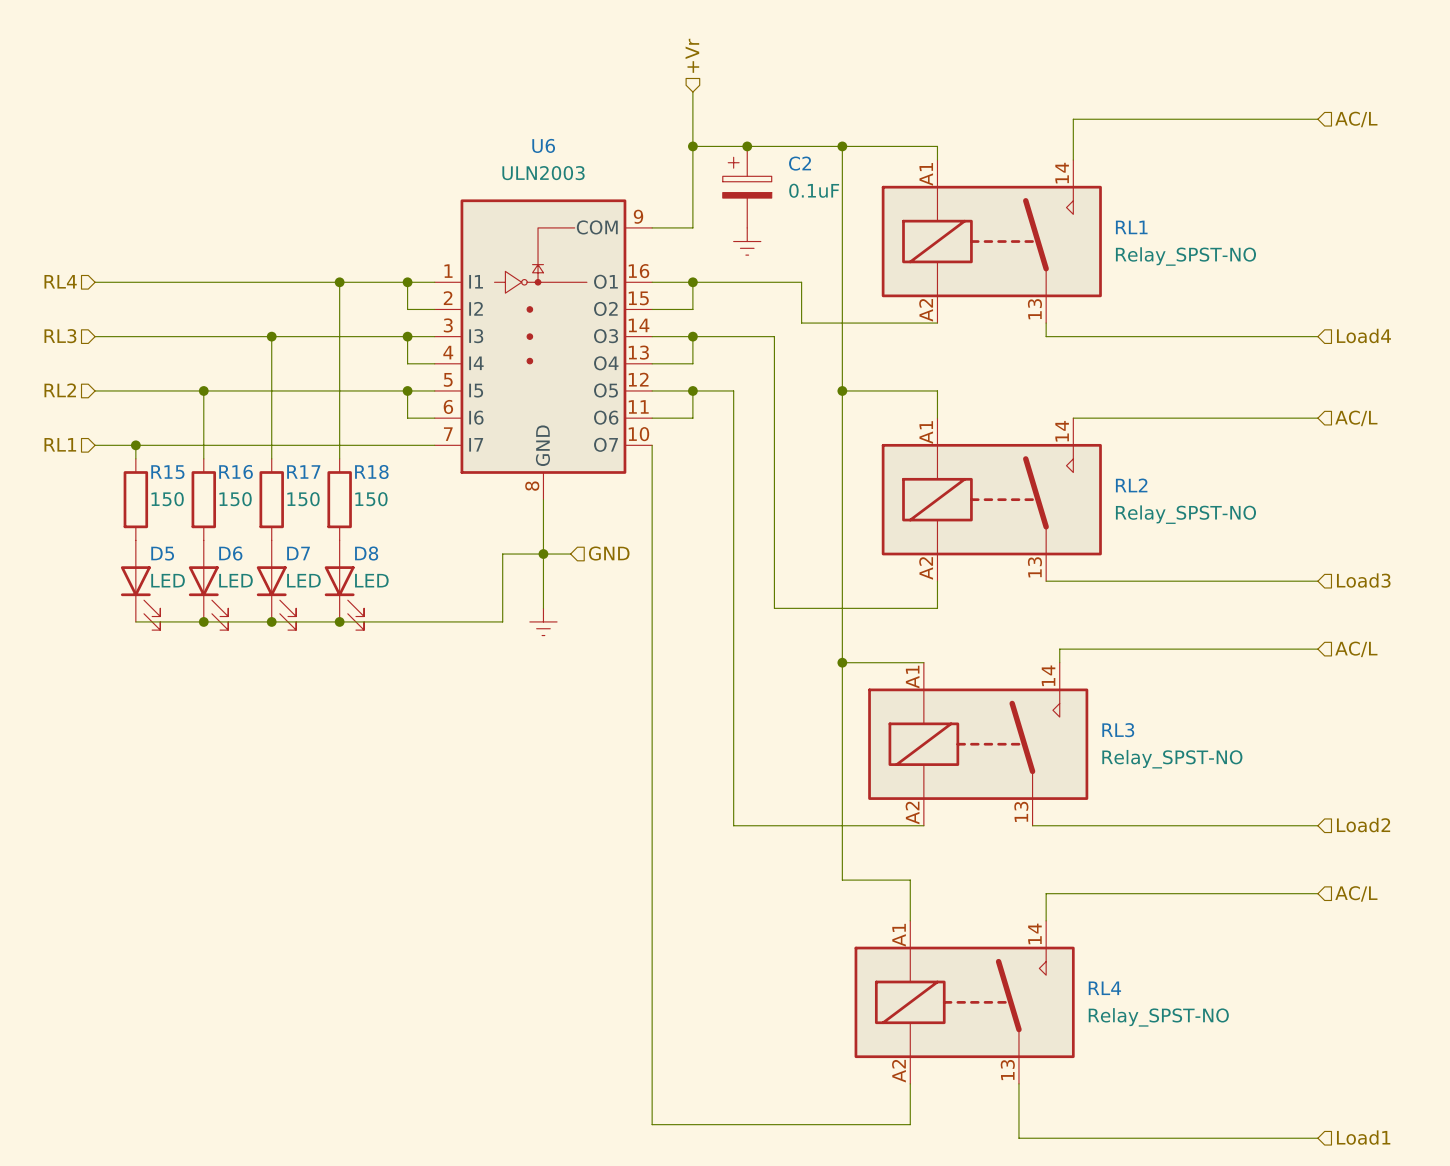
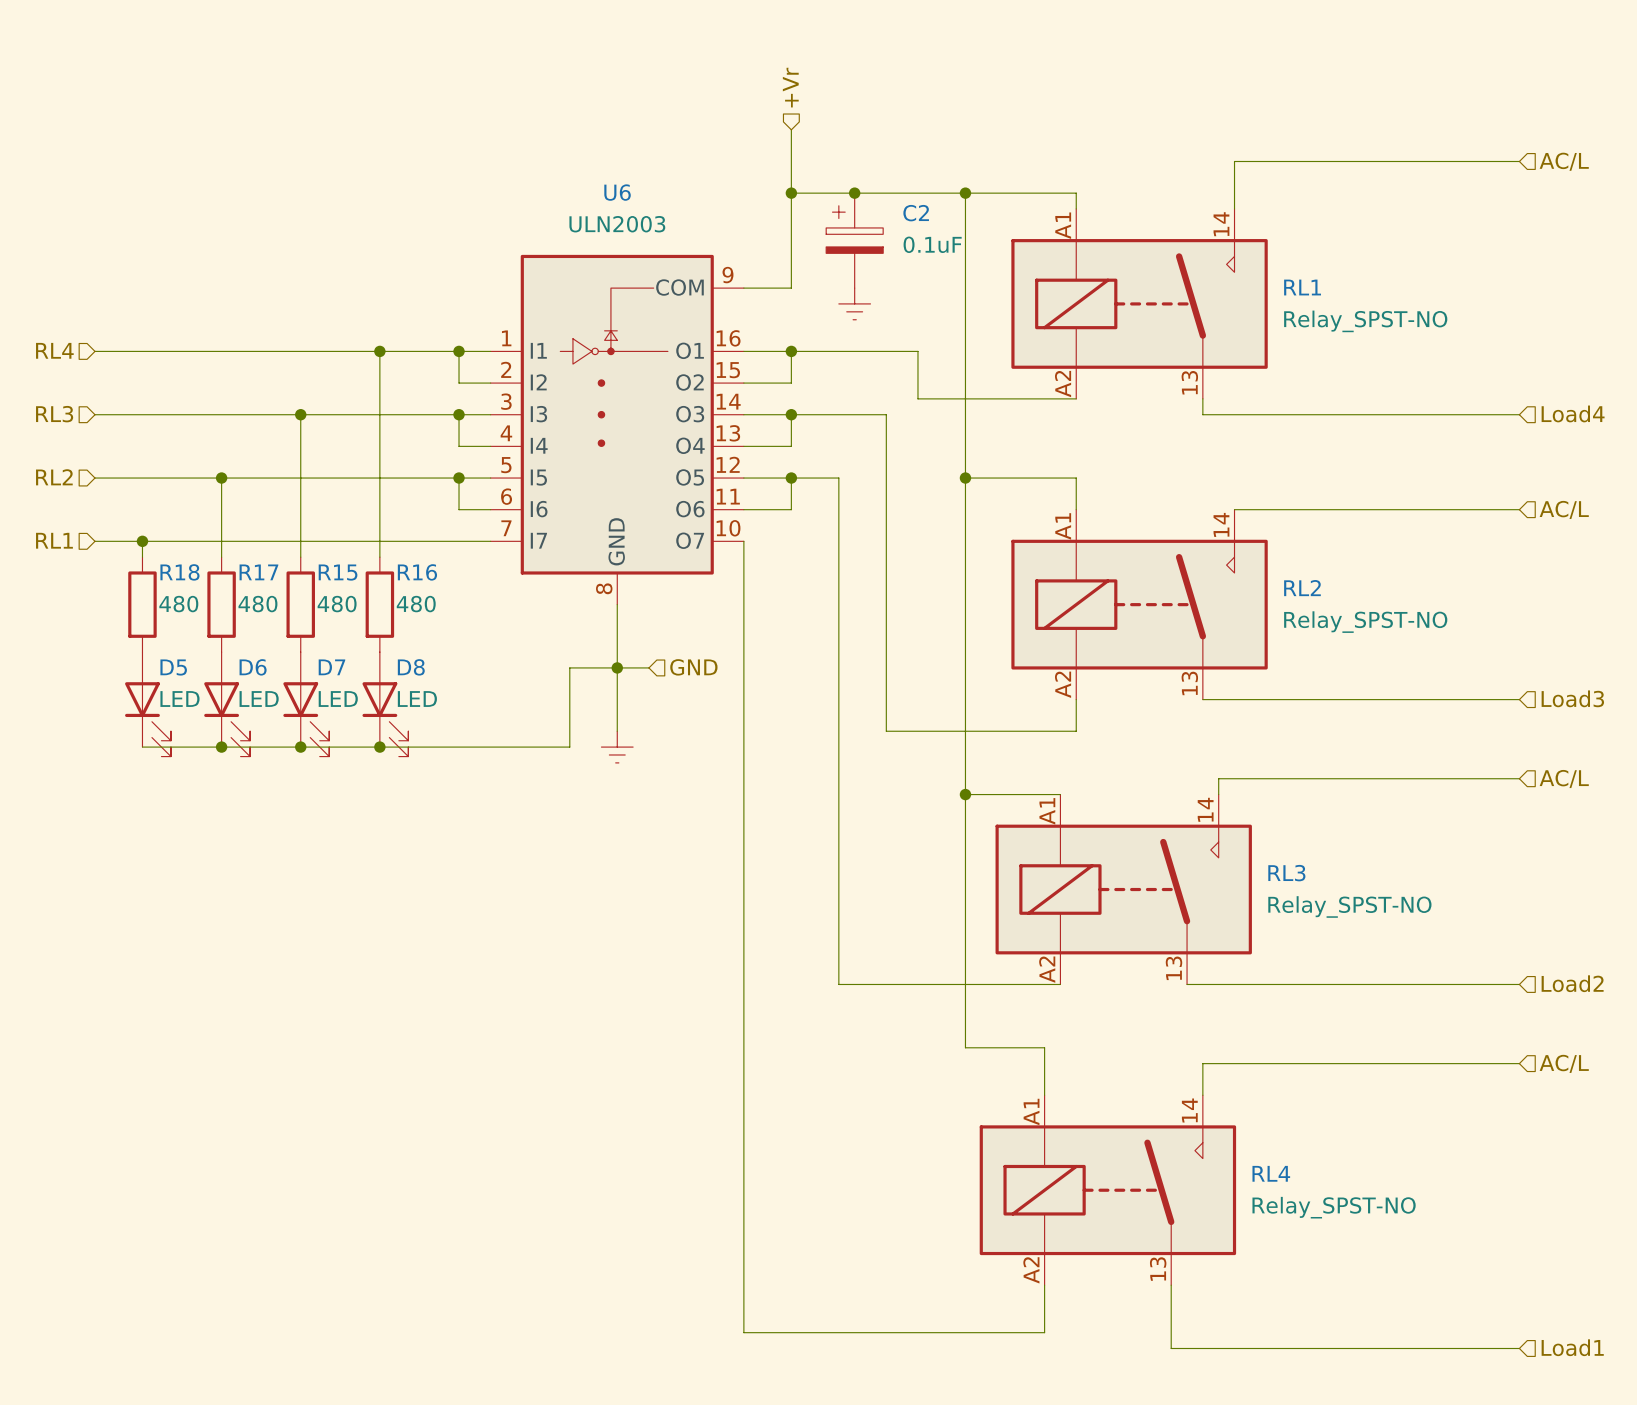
R17 name: R17 (303, 471) -> R15 (338, 572)
R15 name: R15 (167, 472) -> R18 (179, 572)
R16 name: R16 (236, 472) -> R17 (258, 572)
R18 name: R18 (371, 472) -> R16 (417, 572)
R15 value: 150 (167, 499) -> 480 (178, 604)
R16 value: 150 (235, 499) -> 480 (257, 604)
R17 value: 150 (303, 499) -> 480 (337, 604)
R18 value: 150 (371, 499) -> 480 (416, 604)

